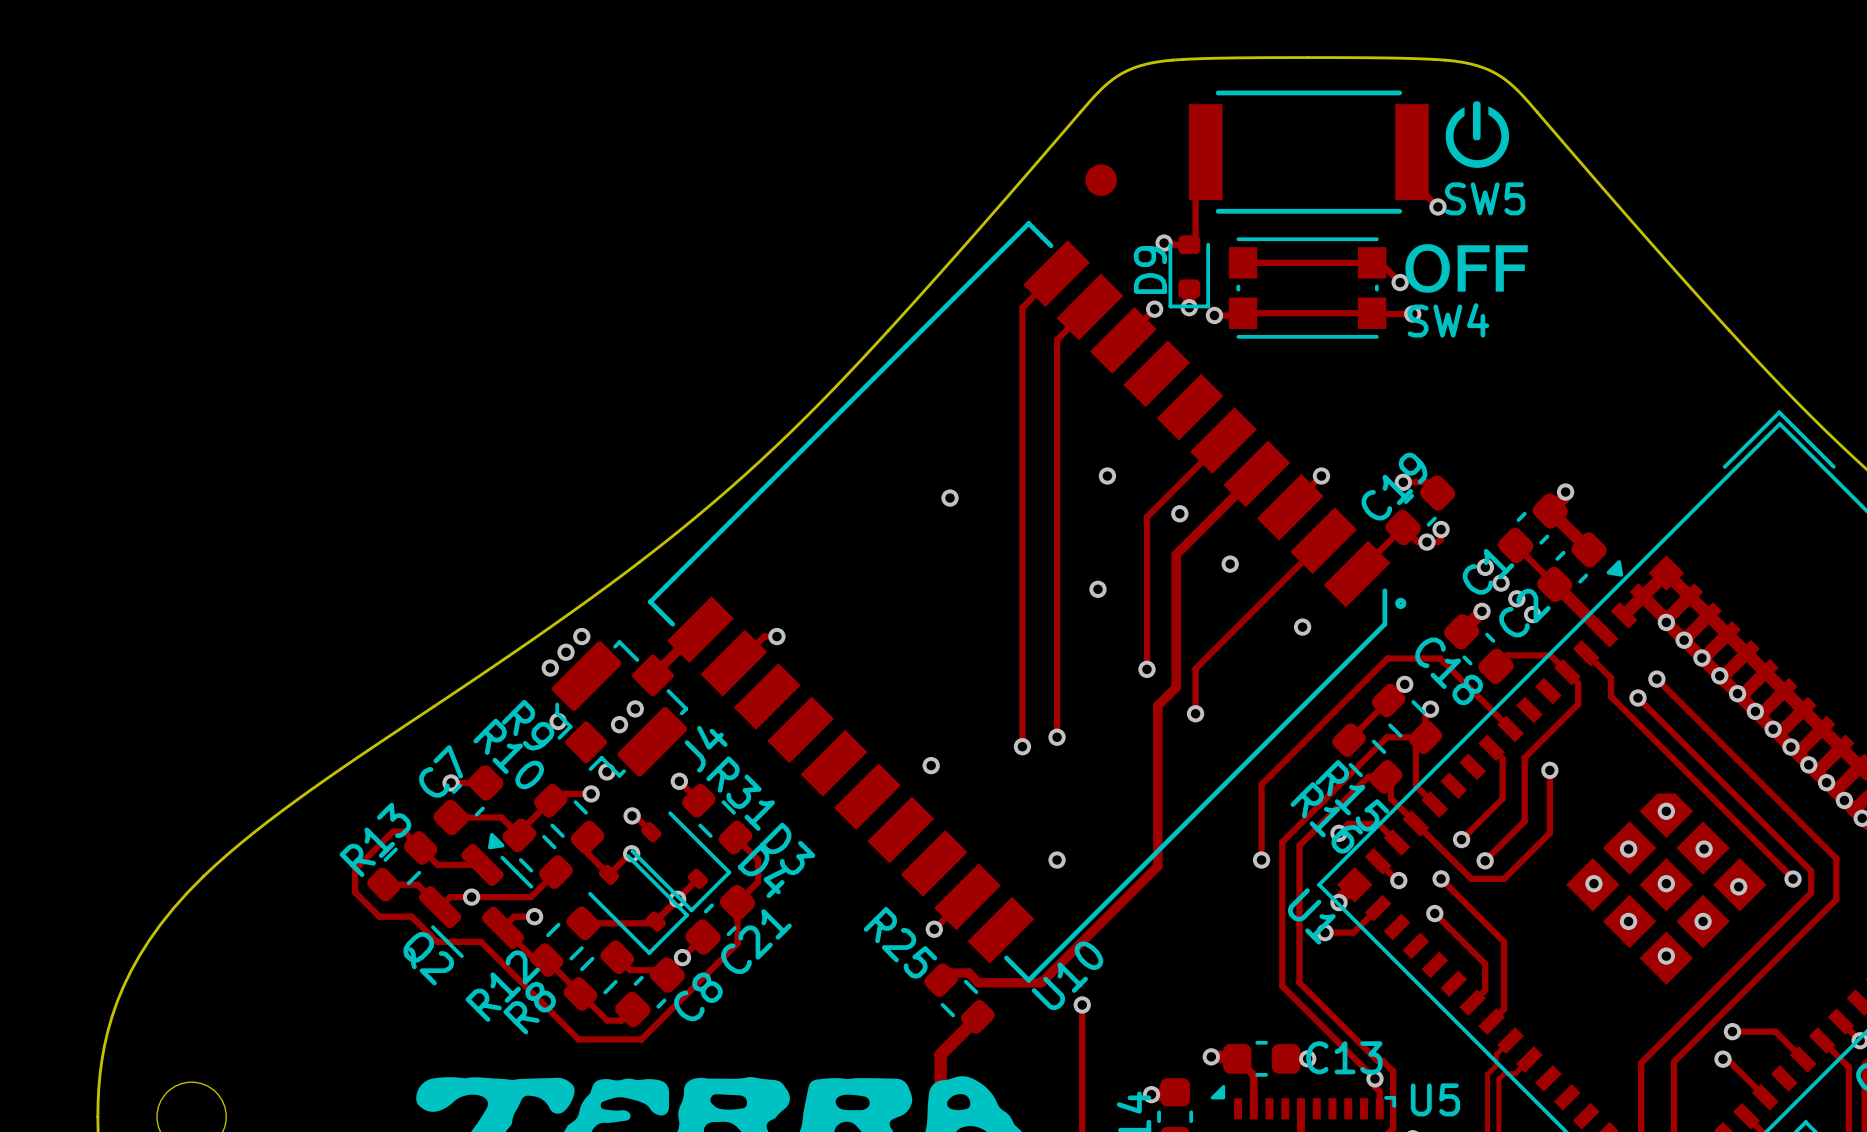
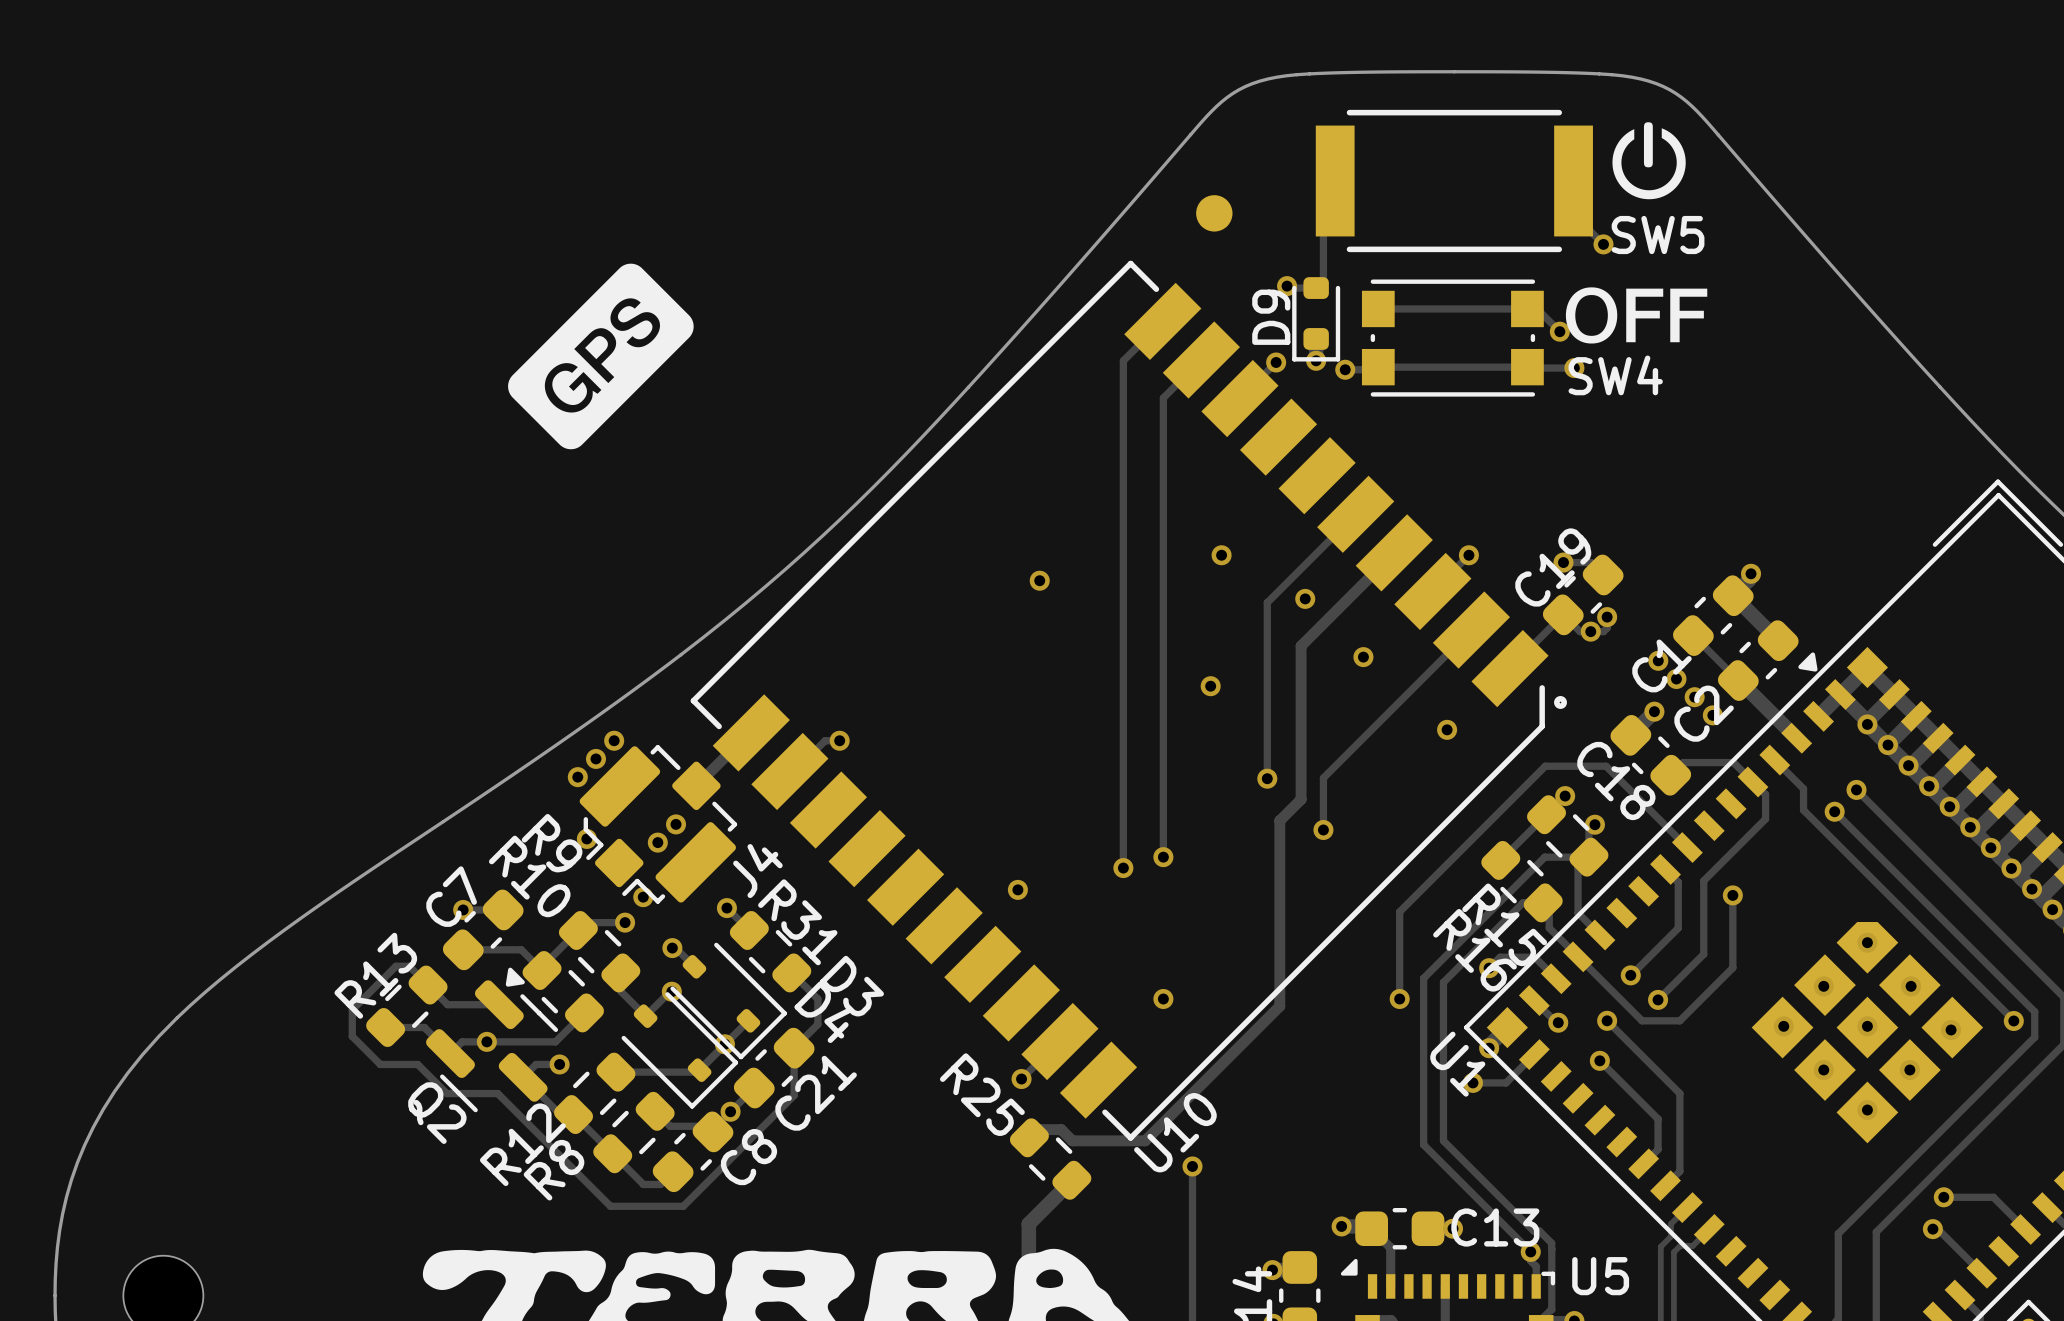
drawing: none -> [508, 263, 694, 450]

